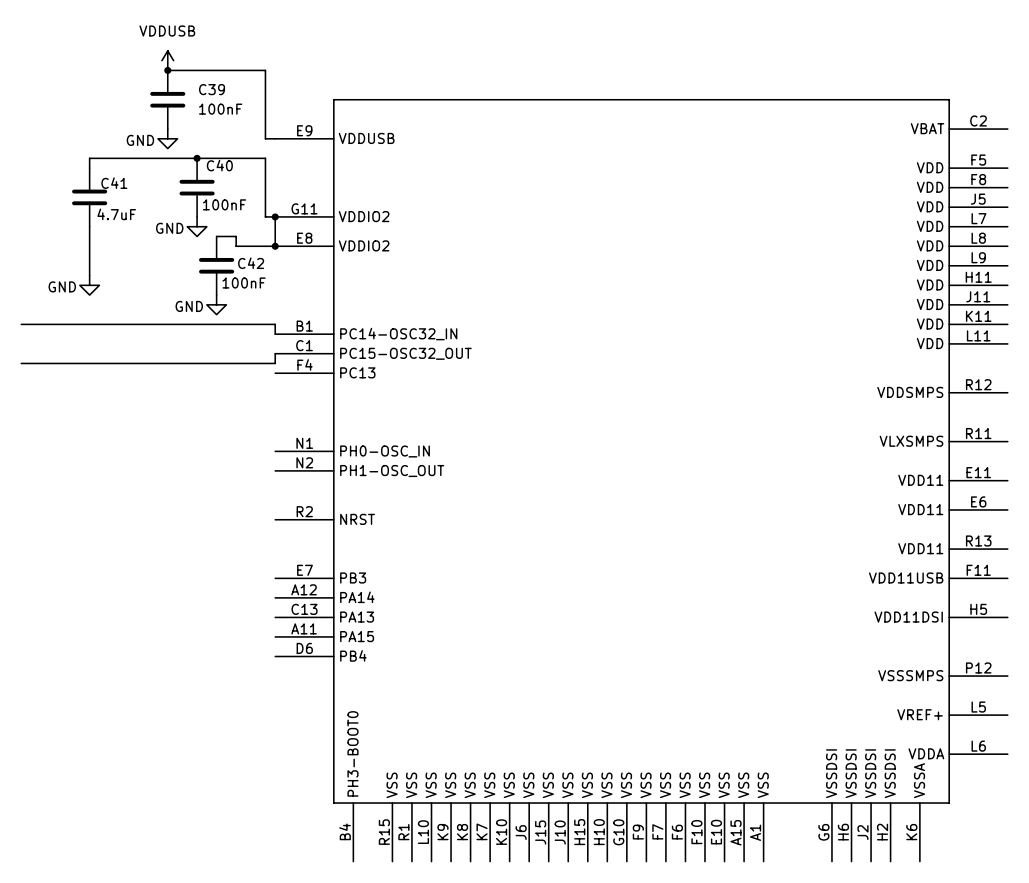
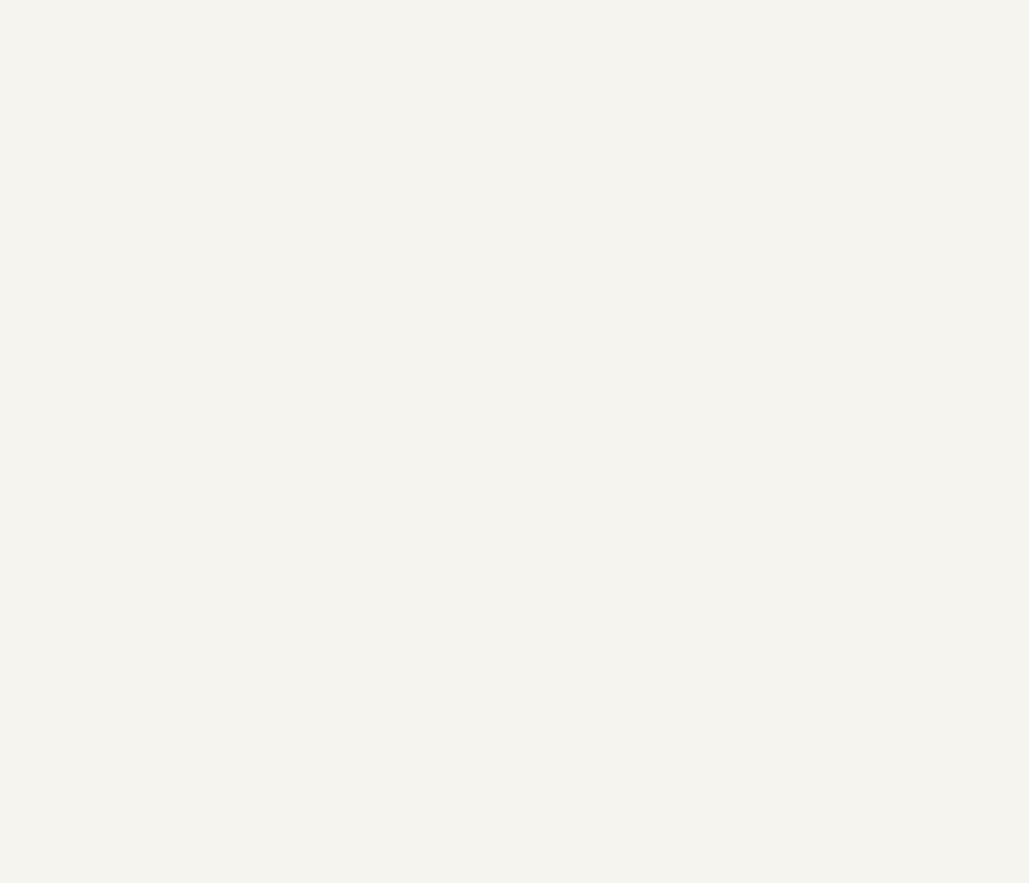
power symbol: VDDUSB (167, 60) -> none
wire: (167, 70) (265, 70) (265, 138) (275, 138) -> none
junction: (167, 70) -> none
C39: 100nF (167, 99) -> none
power symbol: GND (167, 138) -> none
junction: (197, 158) -> none
wire: (89, 168) (89, 158) (265, 158) (265, 216) (275, 216) (275, 246) (236, 246) (236, 236) (216, 236) -> none
C40: 100nF (197, 187) -> none
C41: 4.7uF (89, 197) -> none
junction: (275, 216) -> none
wire: (89, 226) (89, 275) -> none
power symbol: GND (197, 226) -> none
junction: (275, 246) -> none
C42: 100nF (216, 265) -> none
power symbol: GND (89, 285) -> none
power symbol: GND (216, 304) -> none
wire: (21, 324) (275, 324) (275, 334) -> none
wire: (275, 353) (275, 363) (21, 363) -> none
part: (641, 480) -> none

